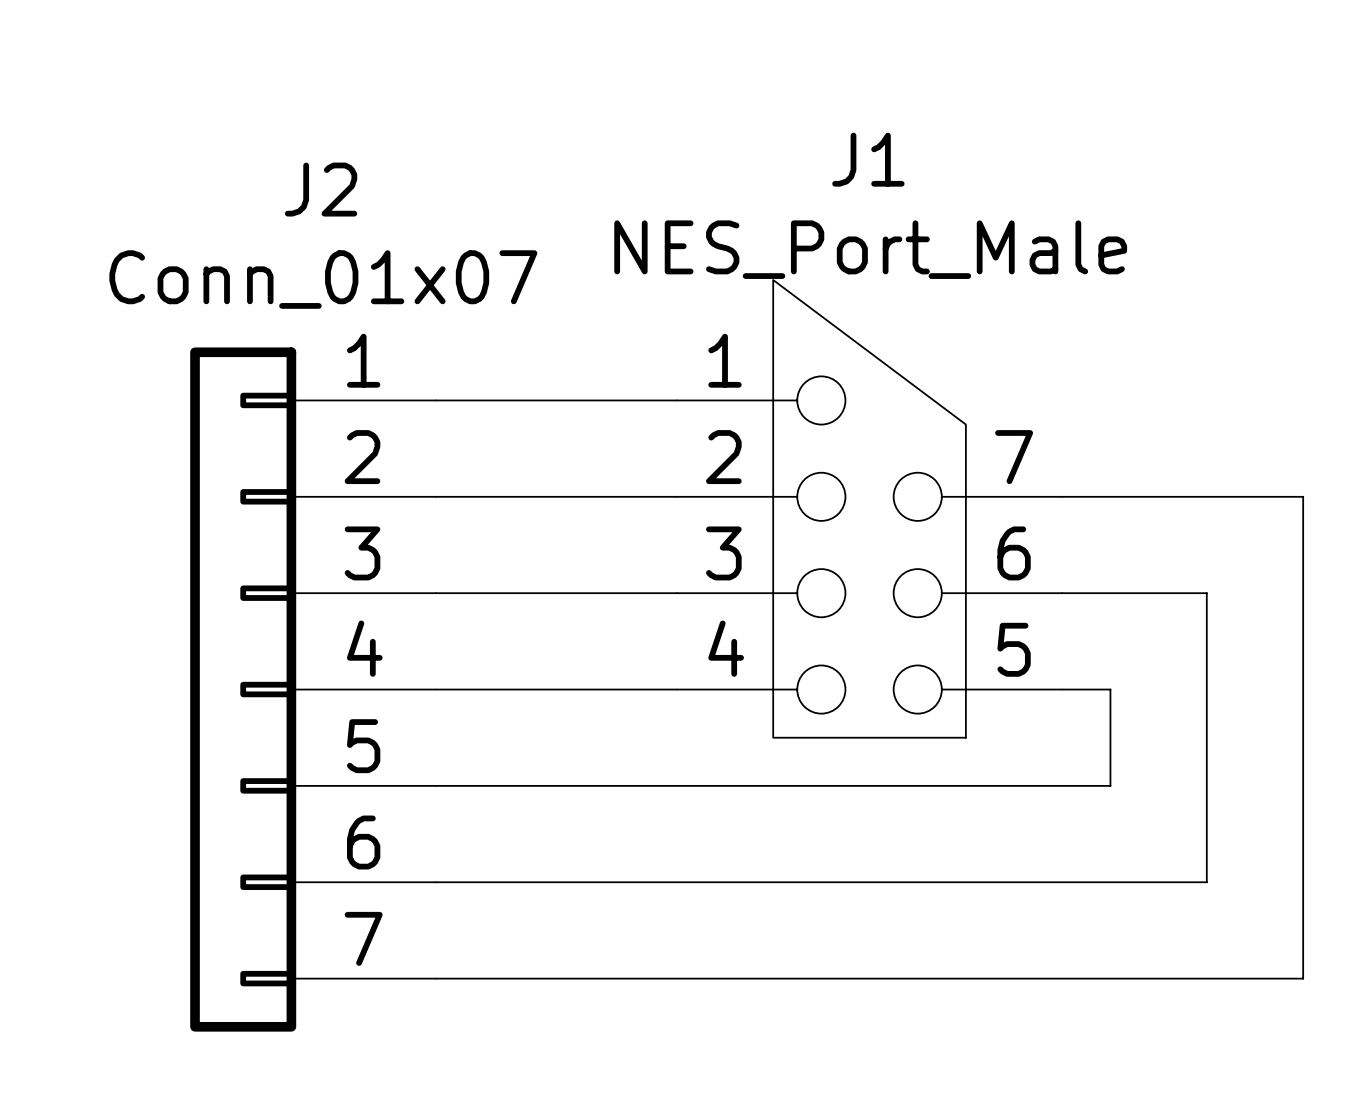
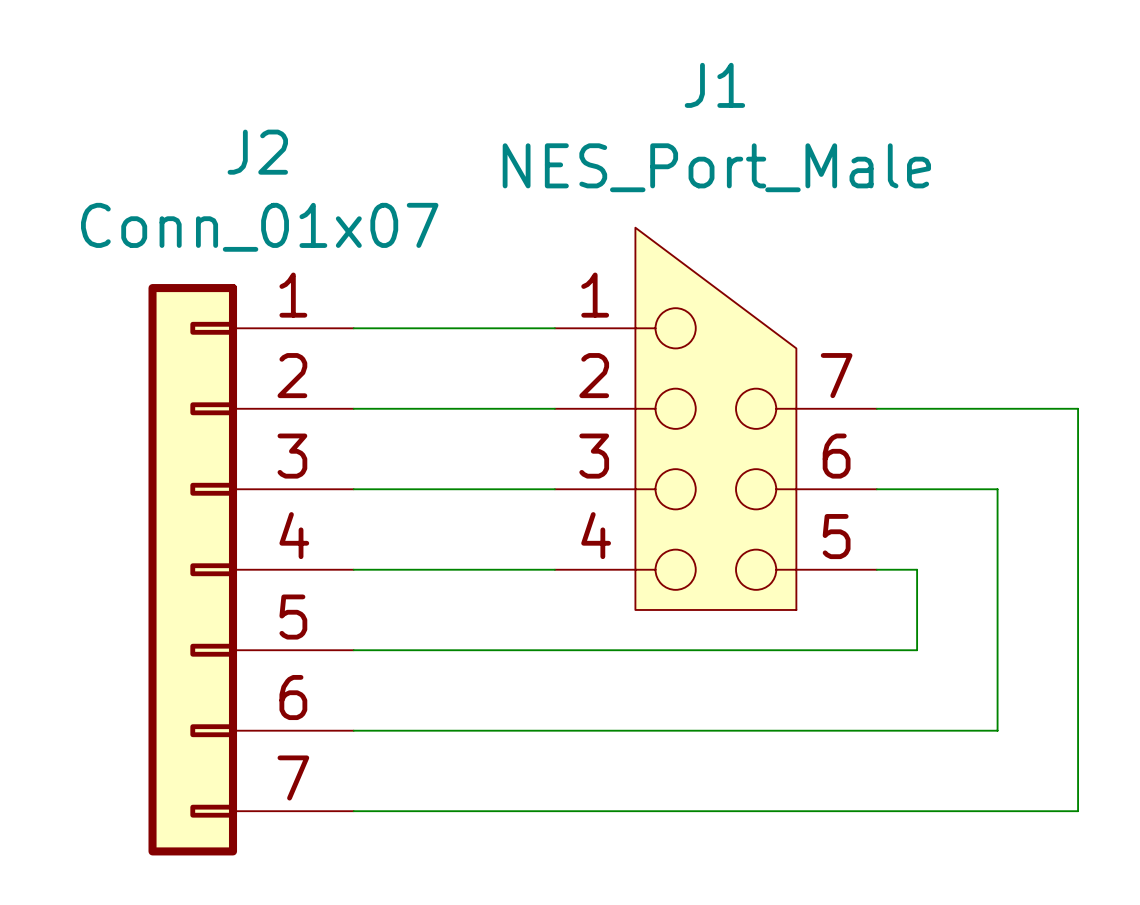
J1 name position: J1 (868, 159) -> J1 (714, 85)
J1 value position: NES_Port_Male (870, 249) -> NES_Port_Male (716, 167)

